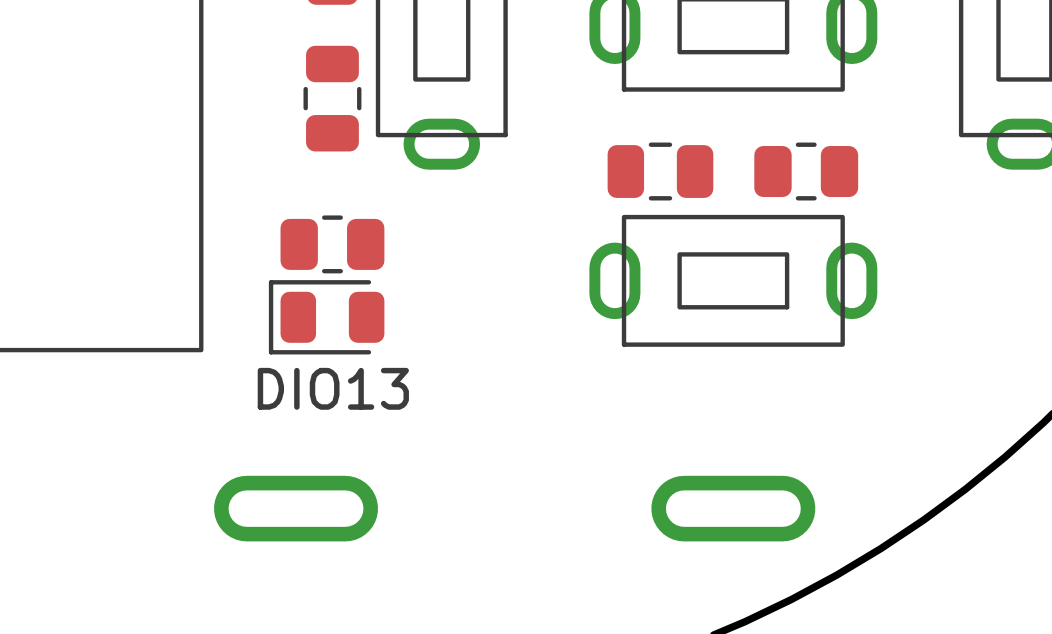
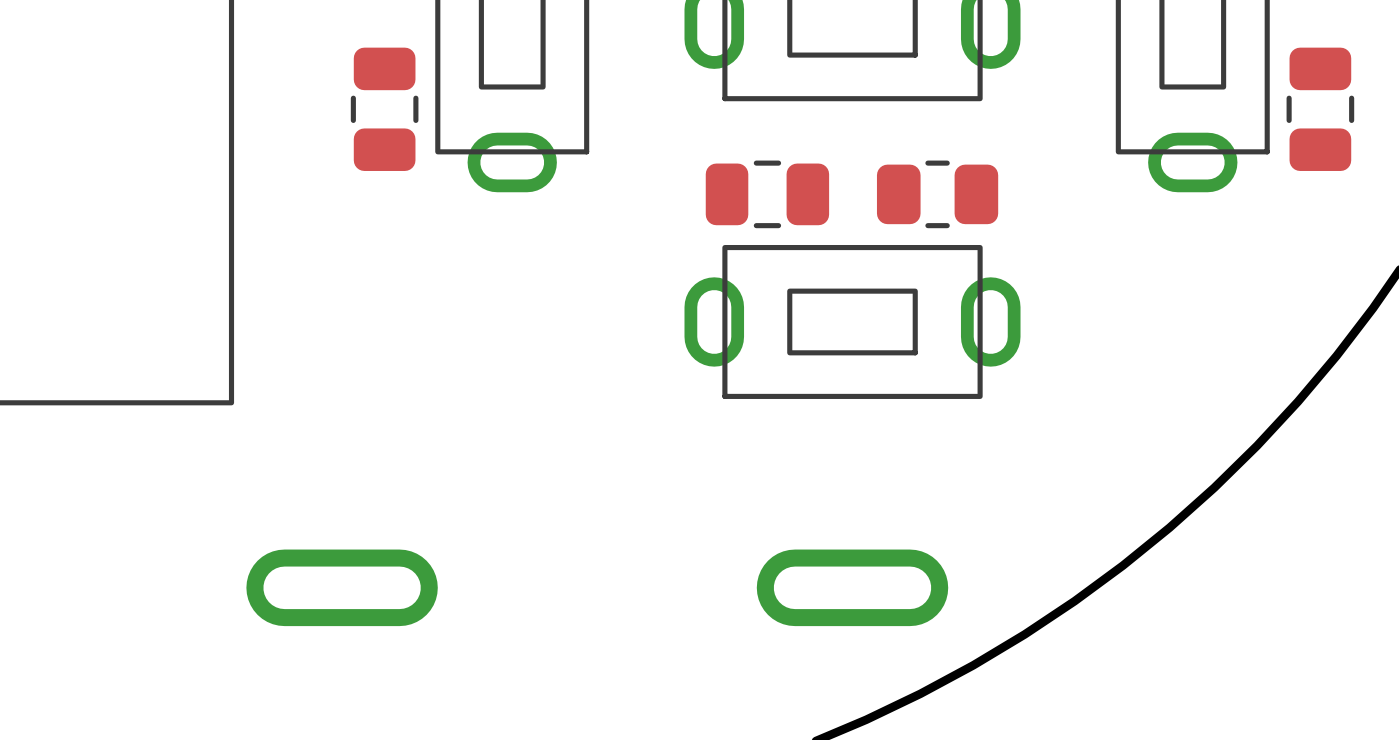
part: (332, 244) -> none
DIO13: (326, 317) -> none

